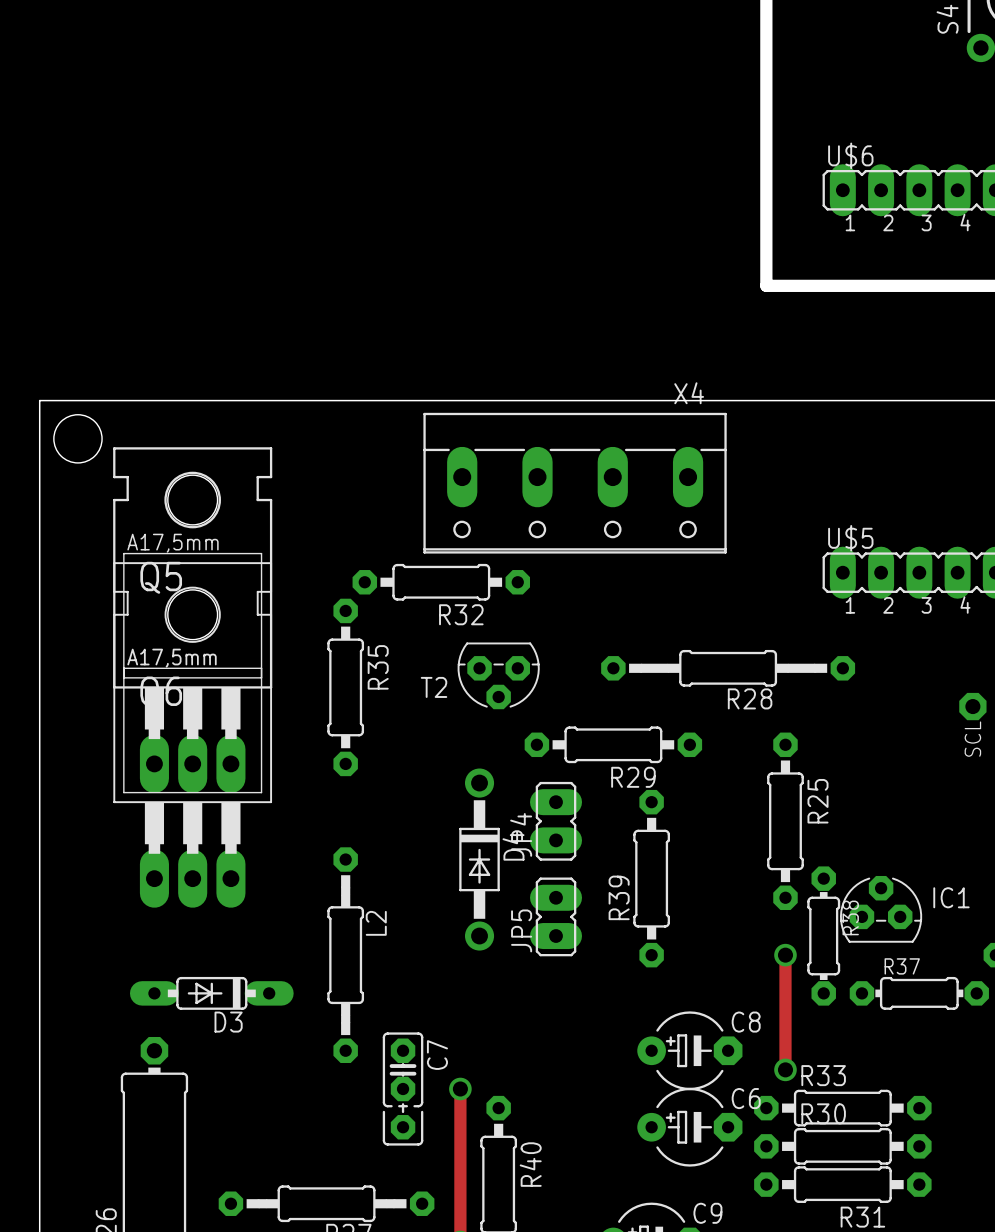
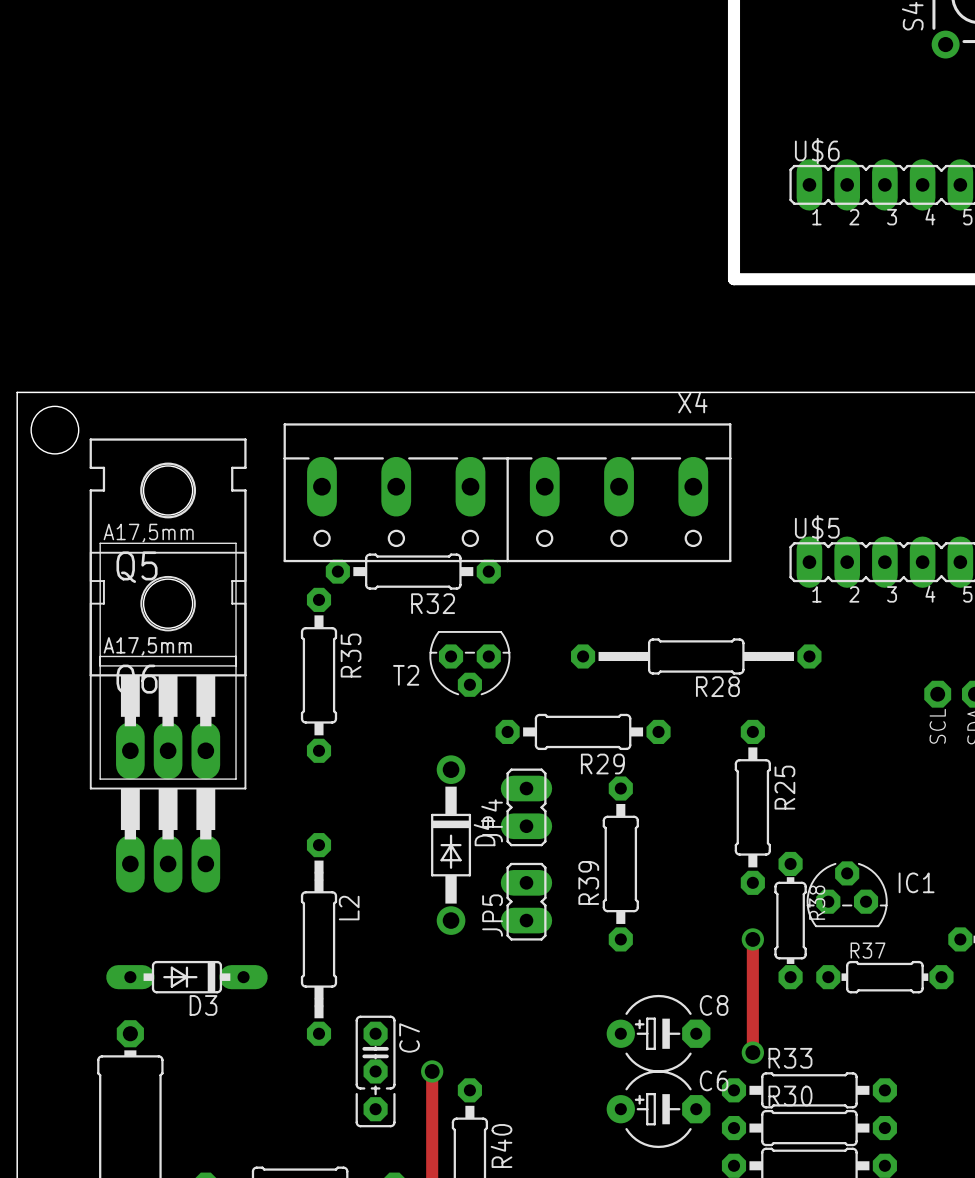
X4 name position: X4 (689, 393) -> X4 (692, 402)
X4 footprint: [423, 412, 727, 554] -> [283, 423, 732, 563]

